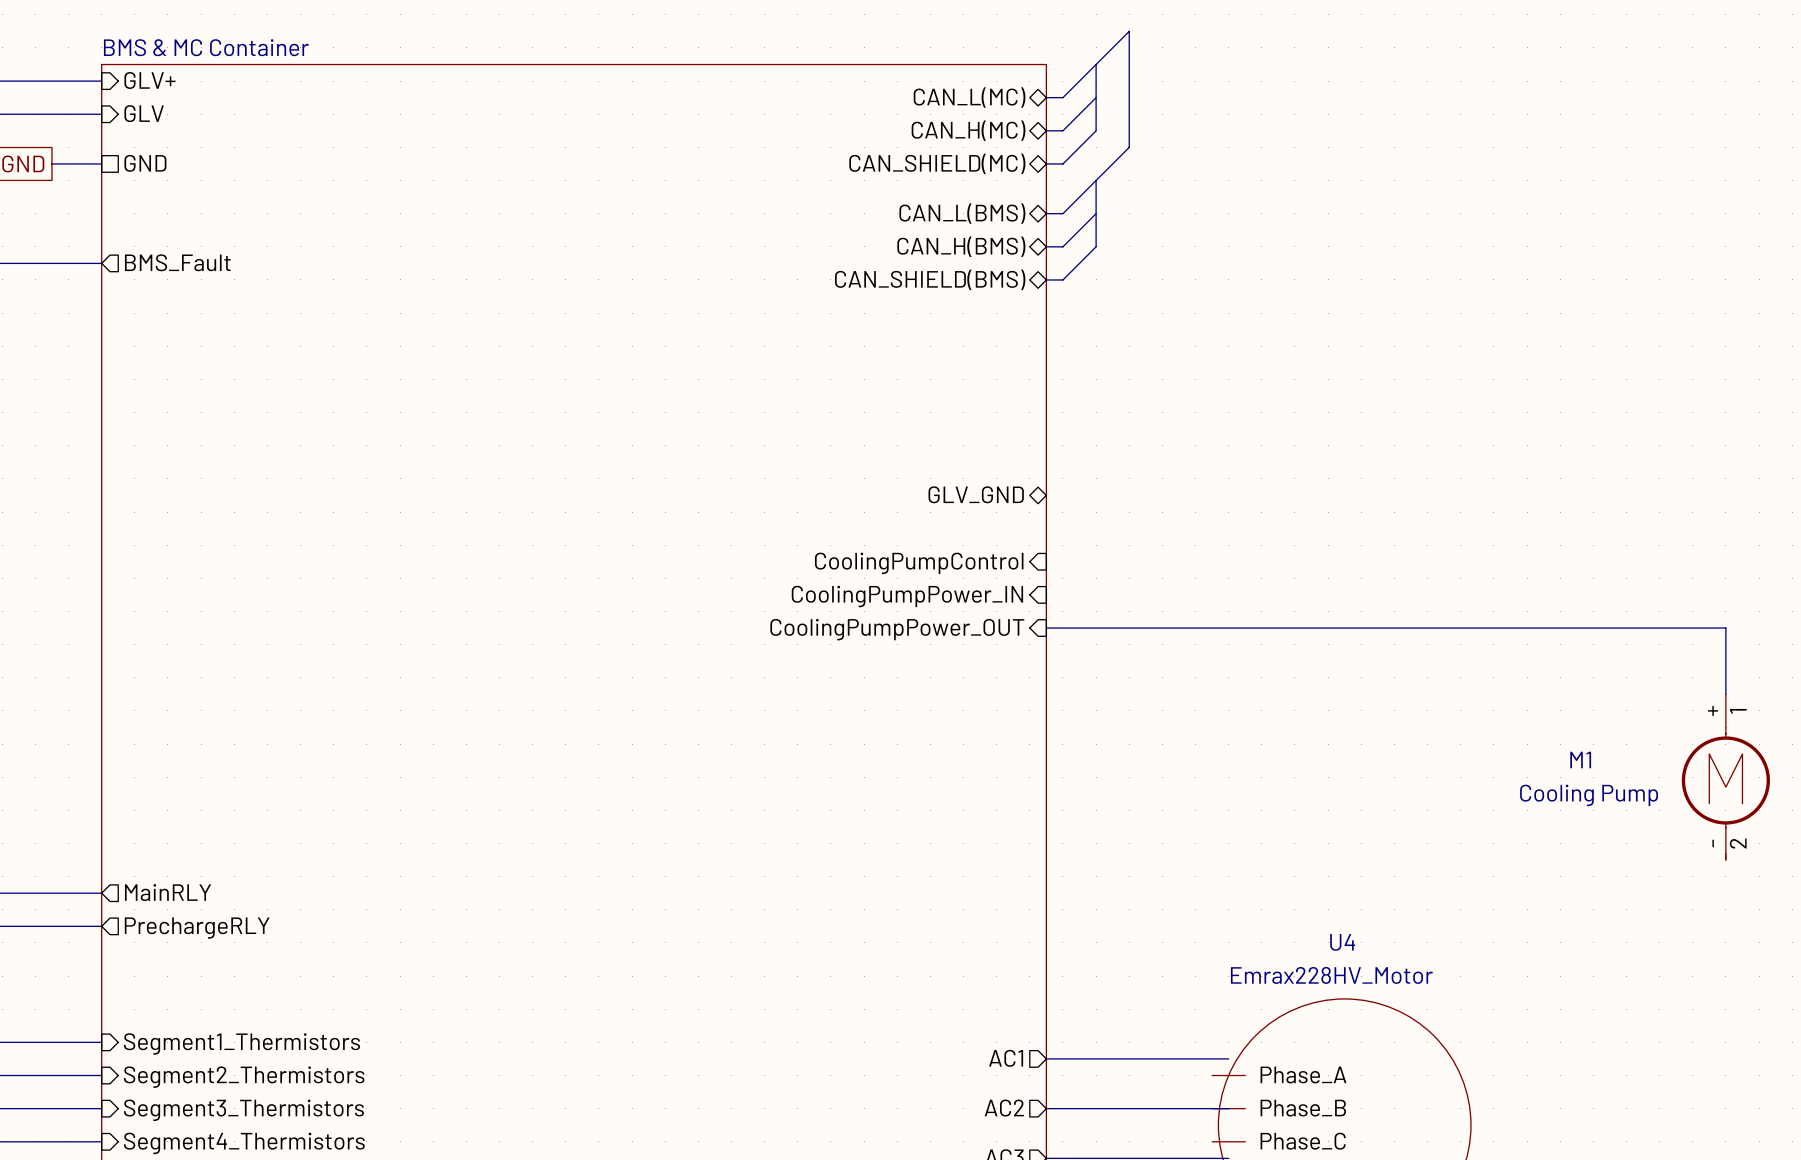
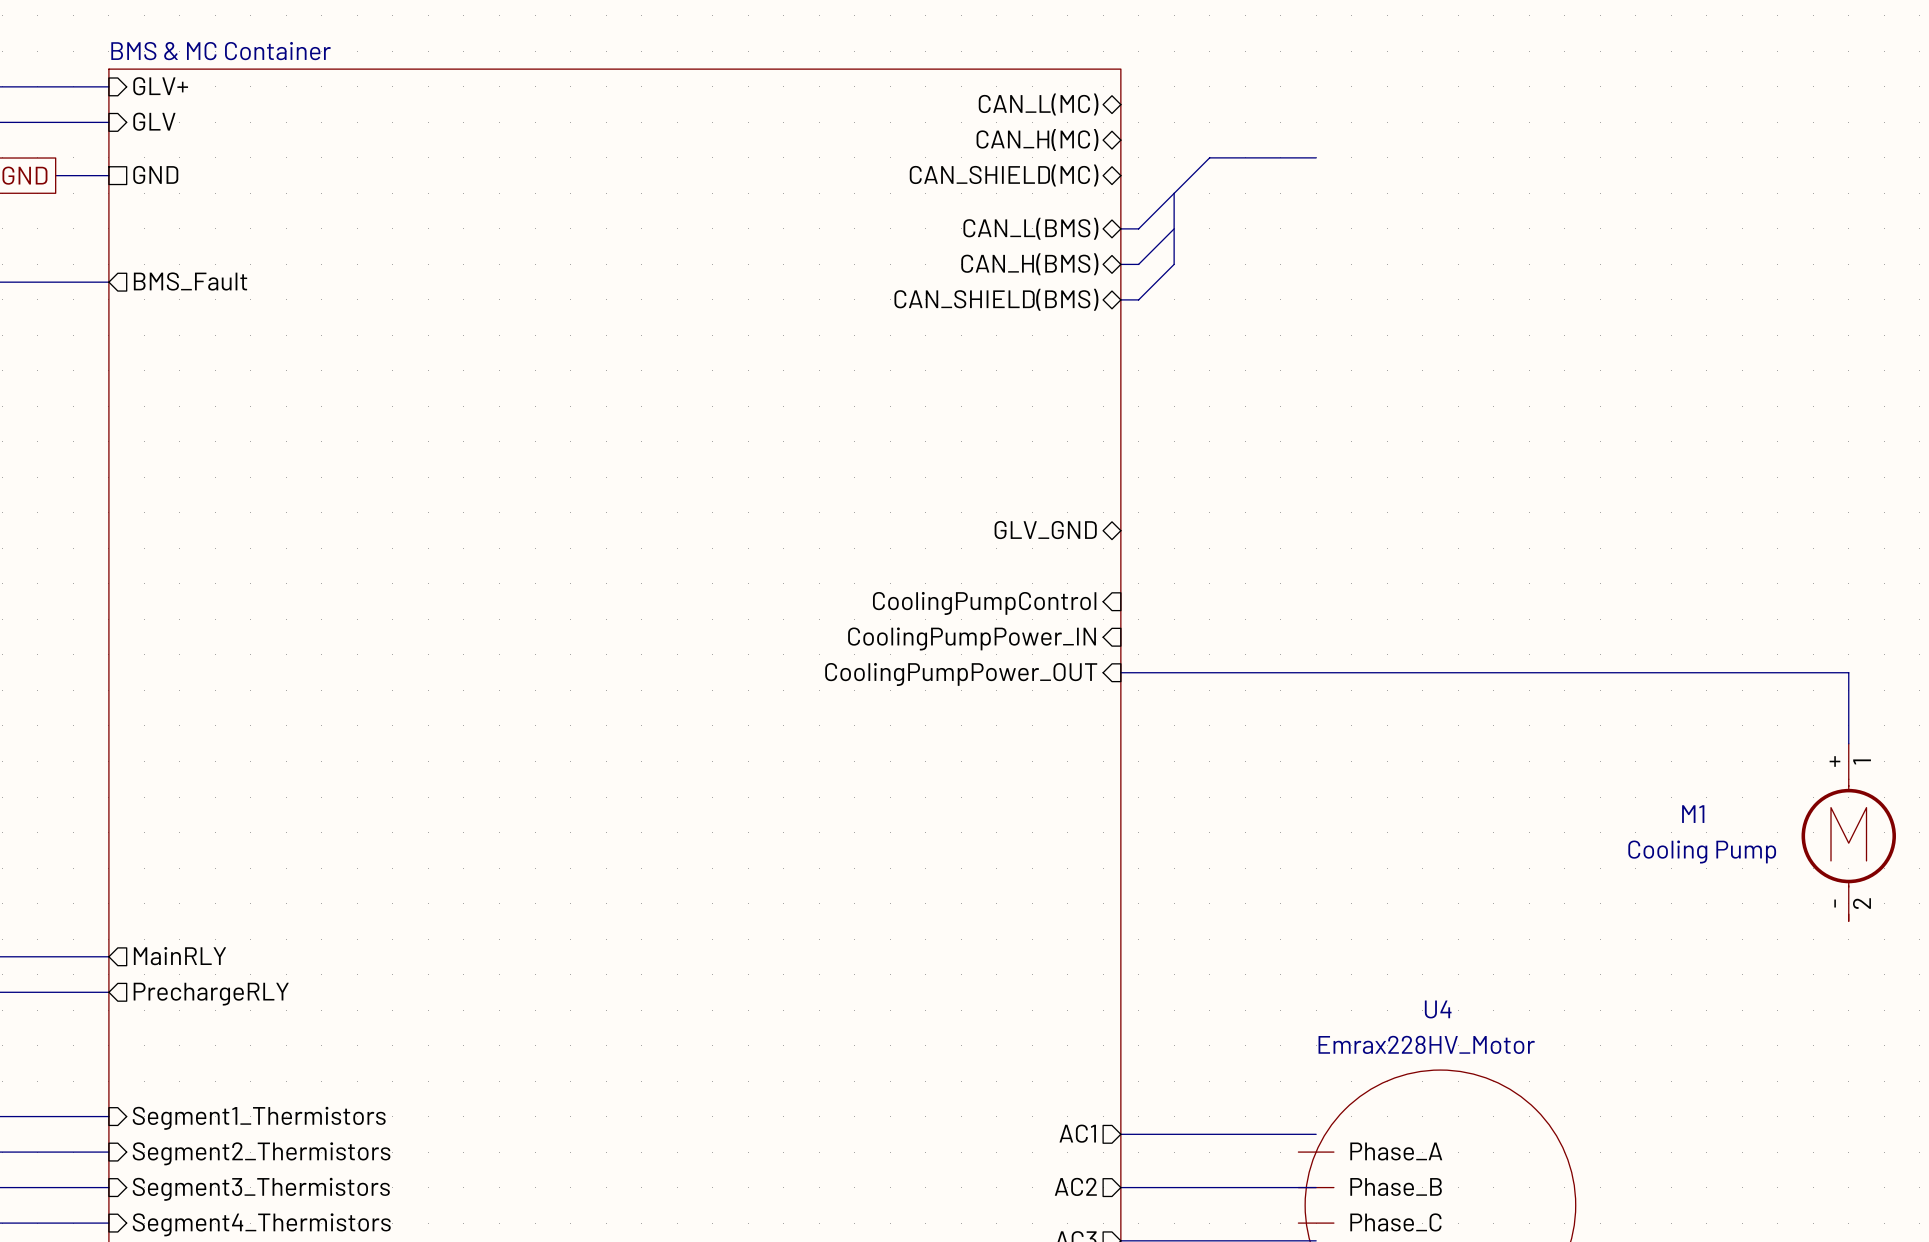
wire: (1096, 64) (1062, 97) (1046, 97) -> none
wire: (1096, 97) (1062, 130) (1046, 130) -> none
wire: (1096, 130) (1062, 163) (1046, 163) -> none
bus: (1096, 130) (1096, 64) (1129, 31) (1129, 147) -> (1316, 157) (1209, 157)

